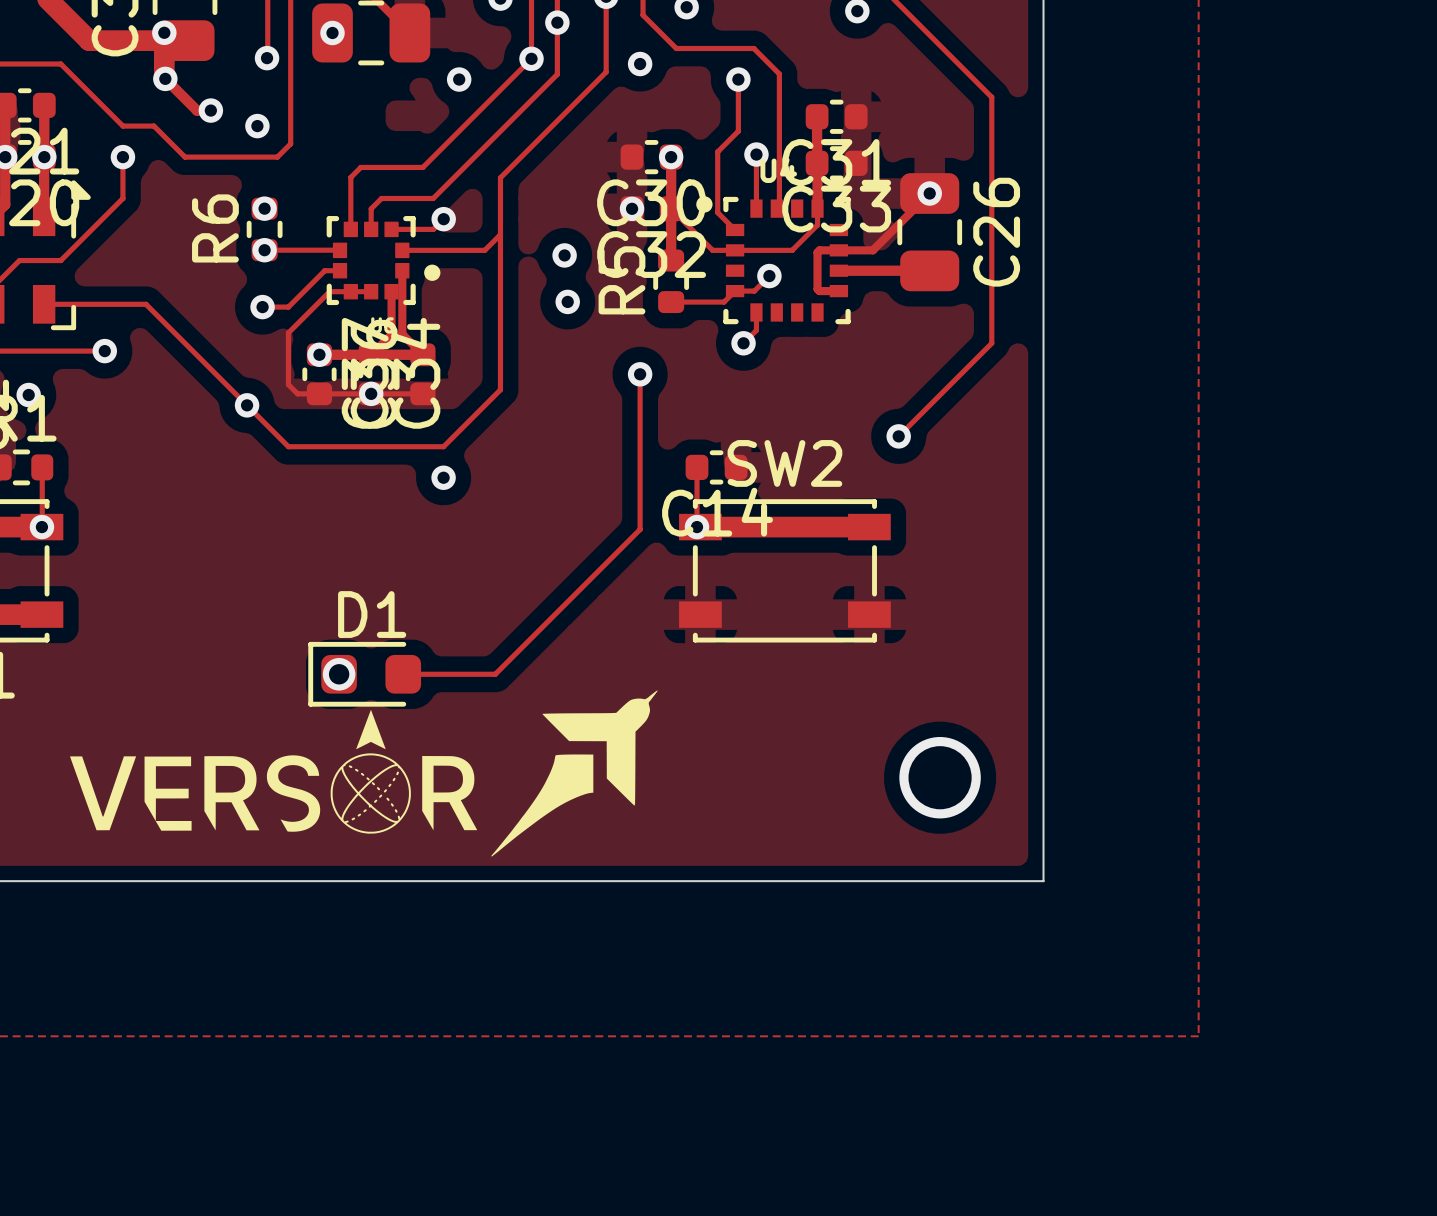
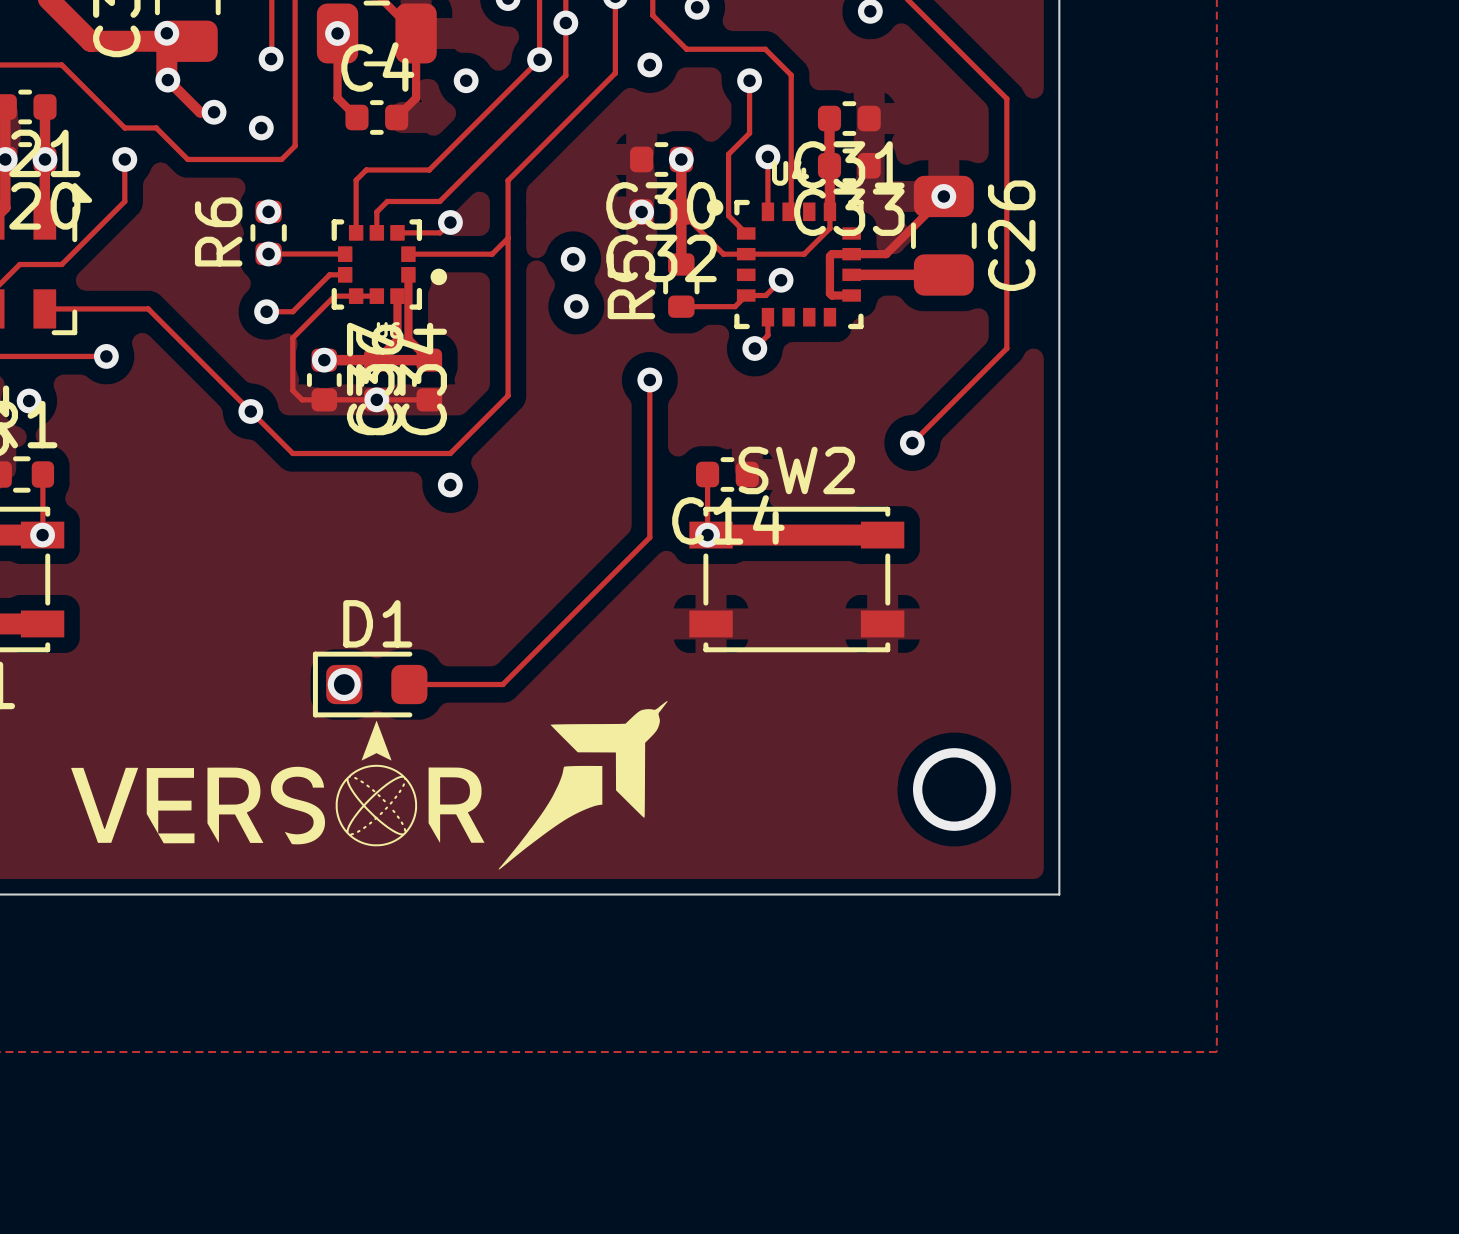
track: none -> (337, 33) (337, 98) (356, 117)
track: none -> (416, 33) (416, 98) (396, 117)
C4: none -> (376, 117)

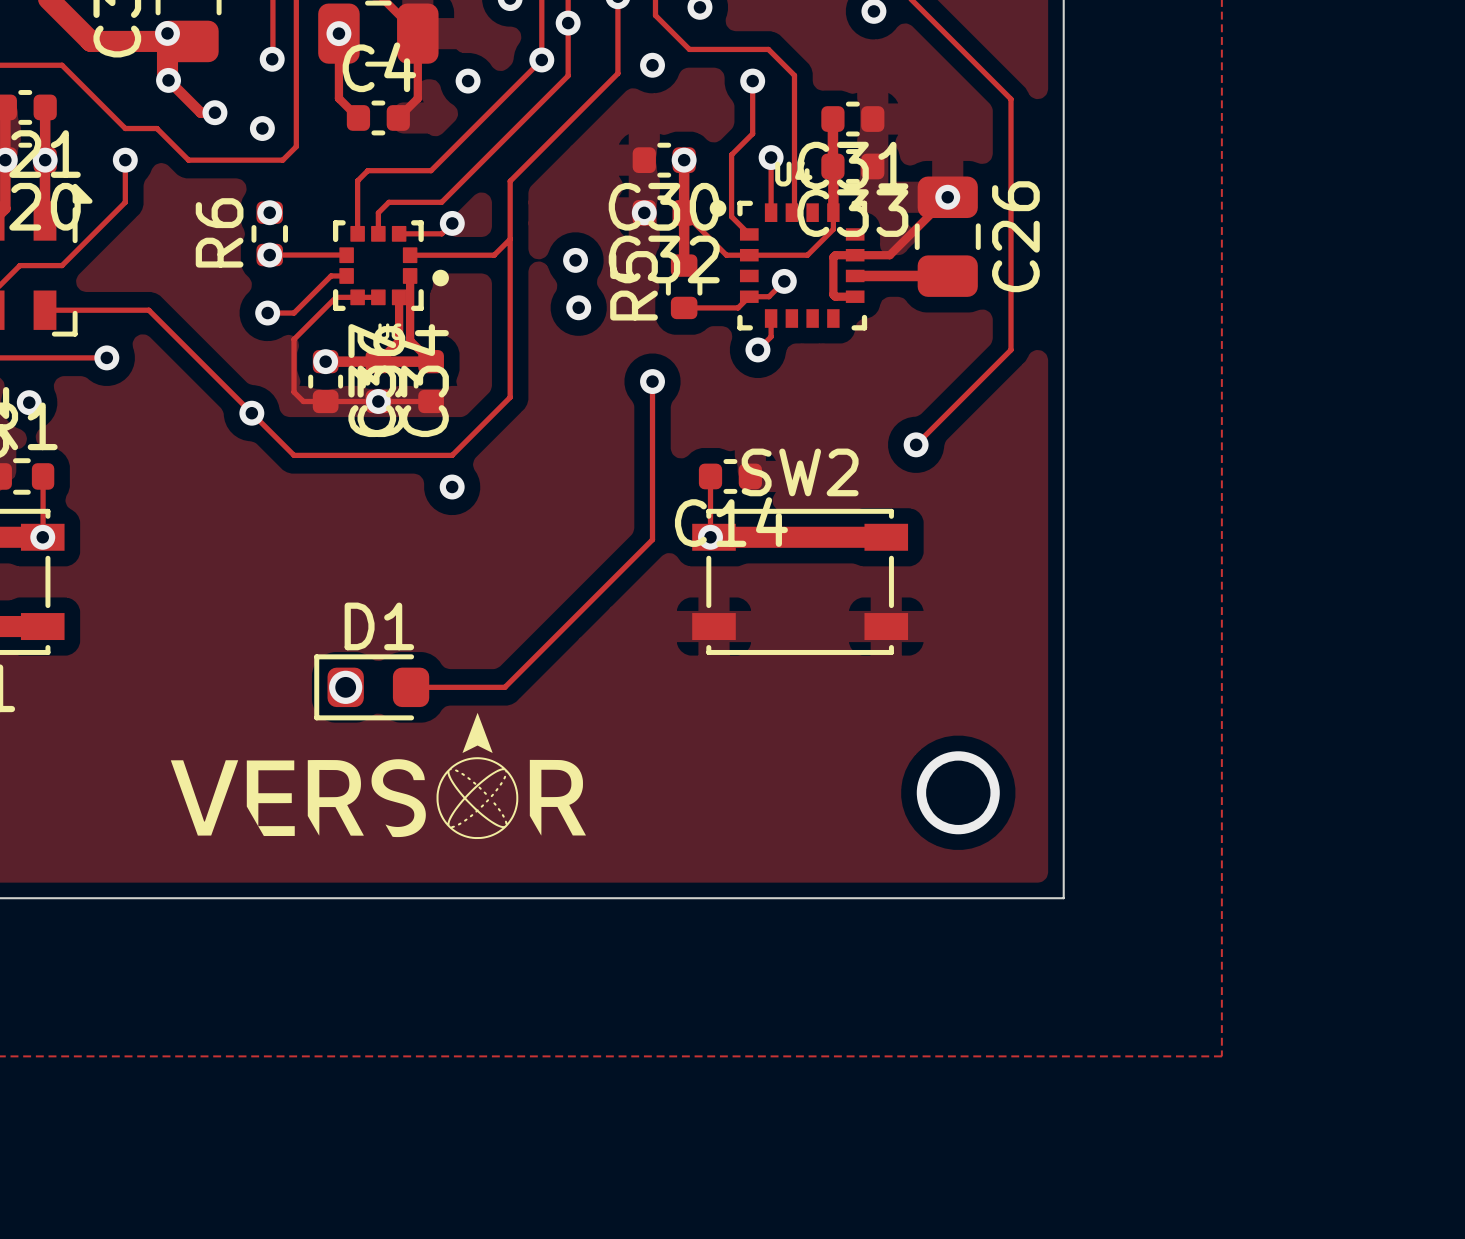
drawing: [498, 700, 668, 870] -> none
drawing position: (277, 783) -> (378, 776)

